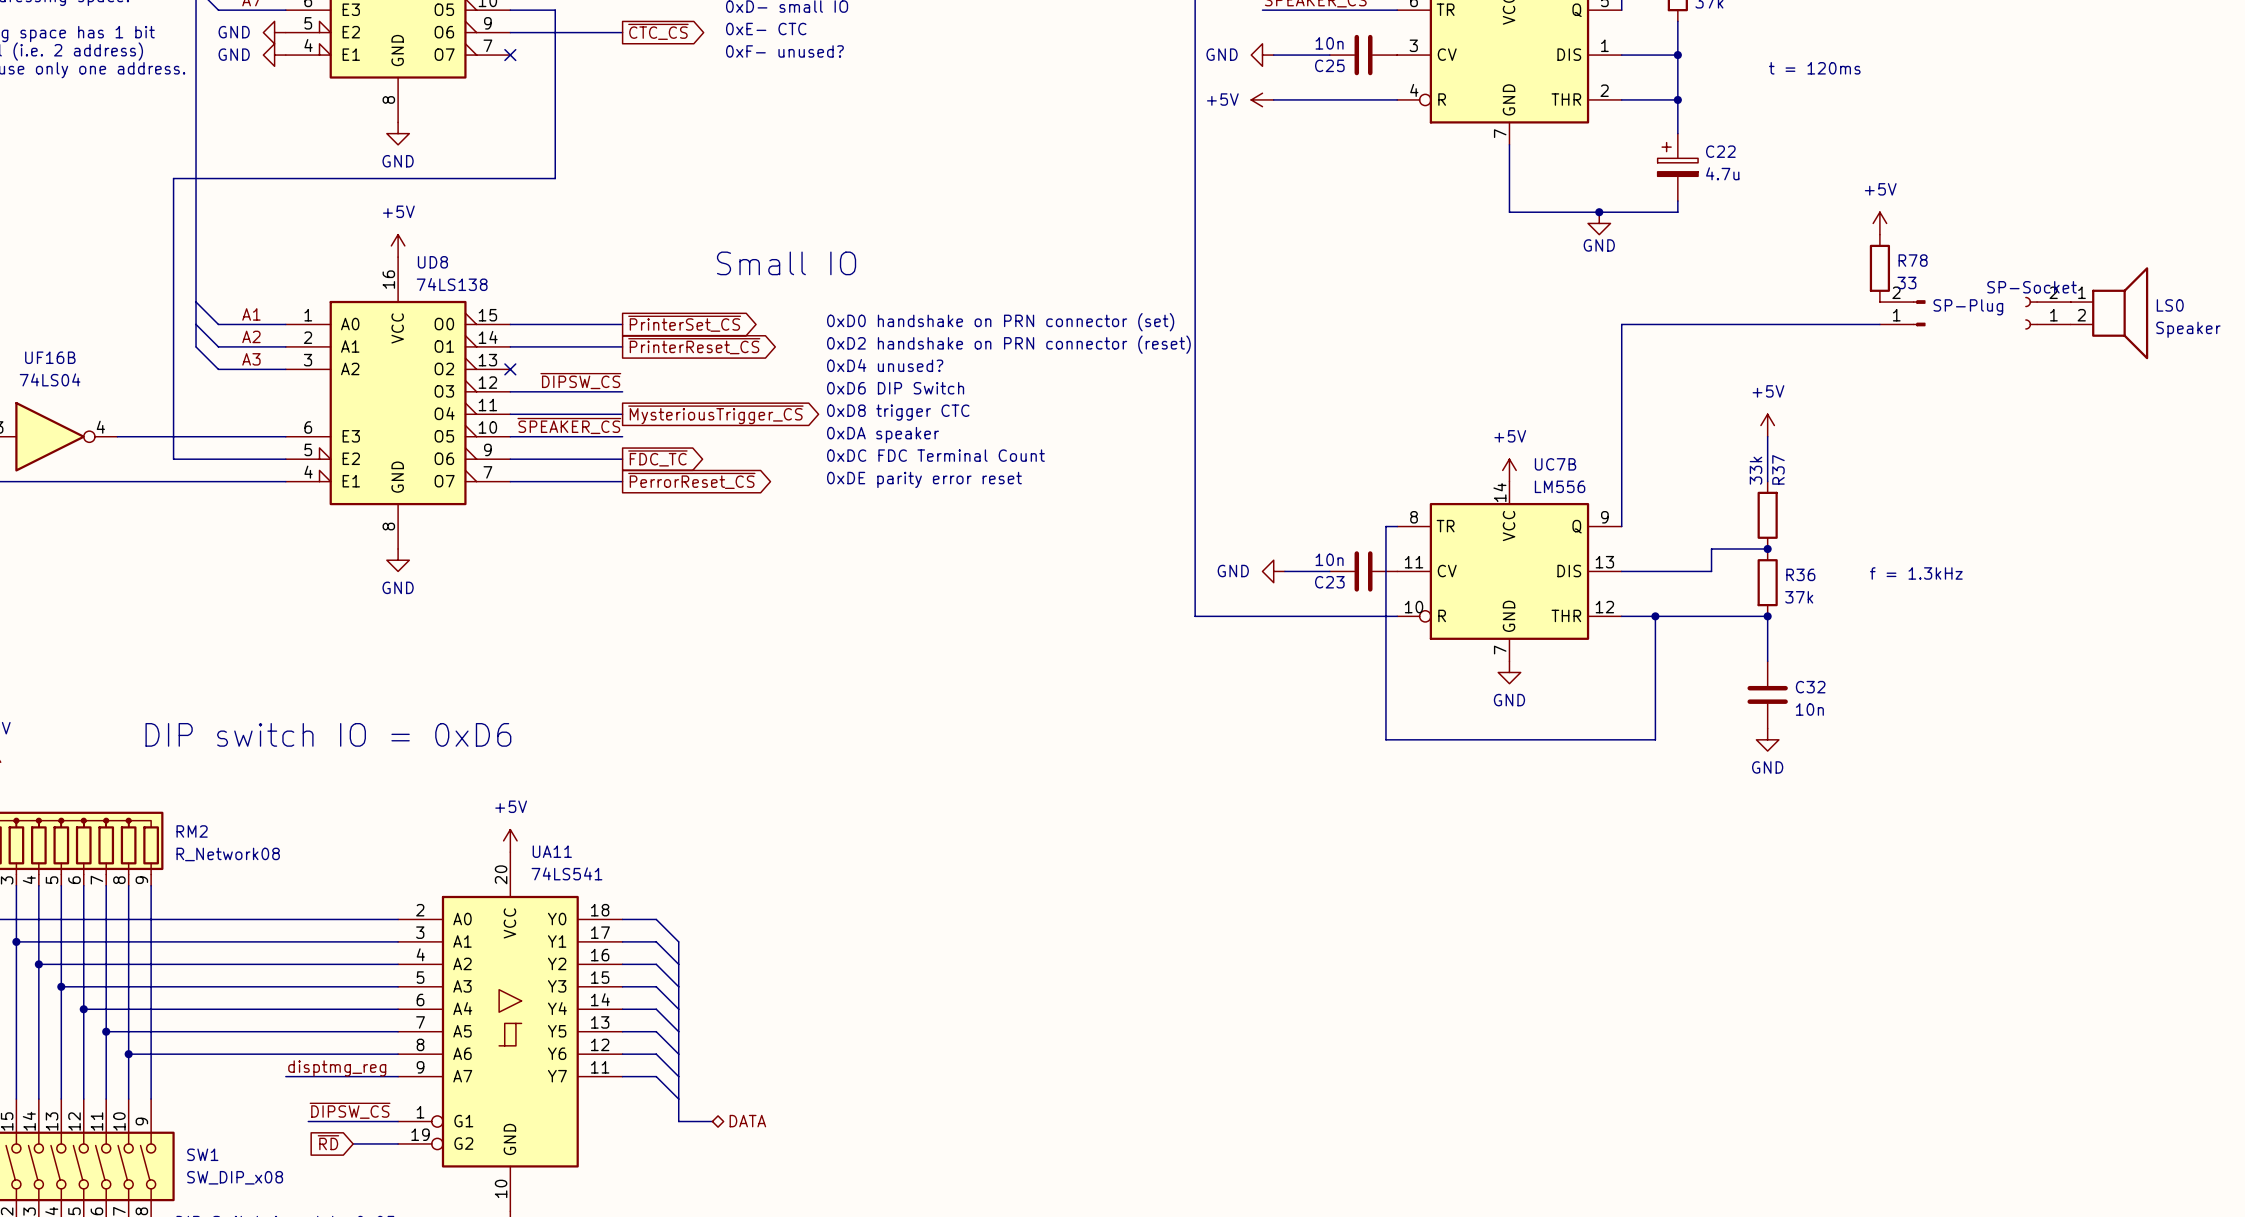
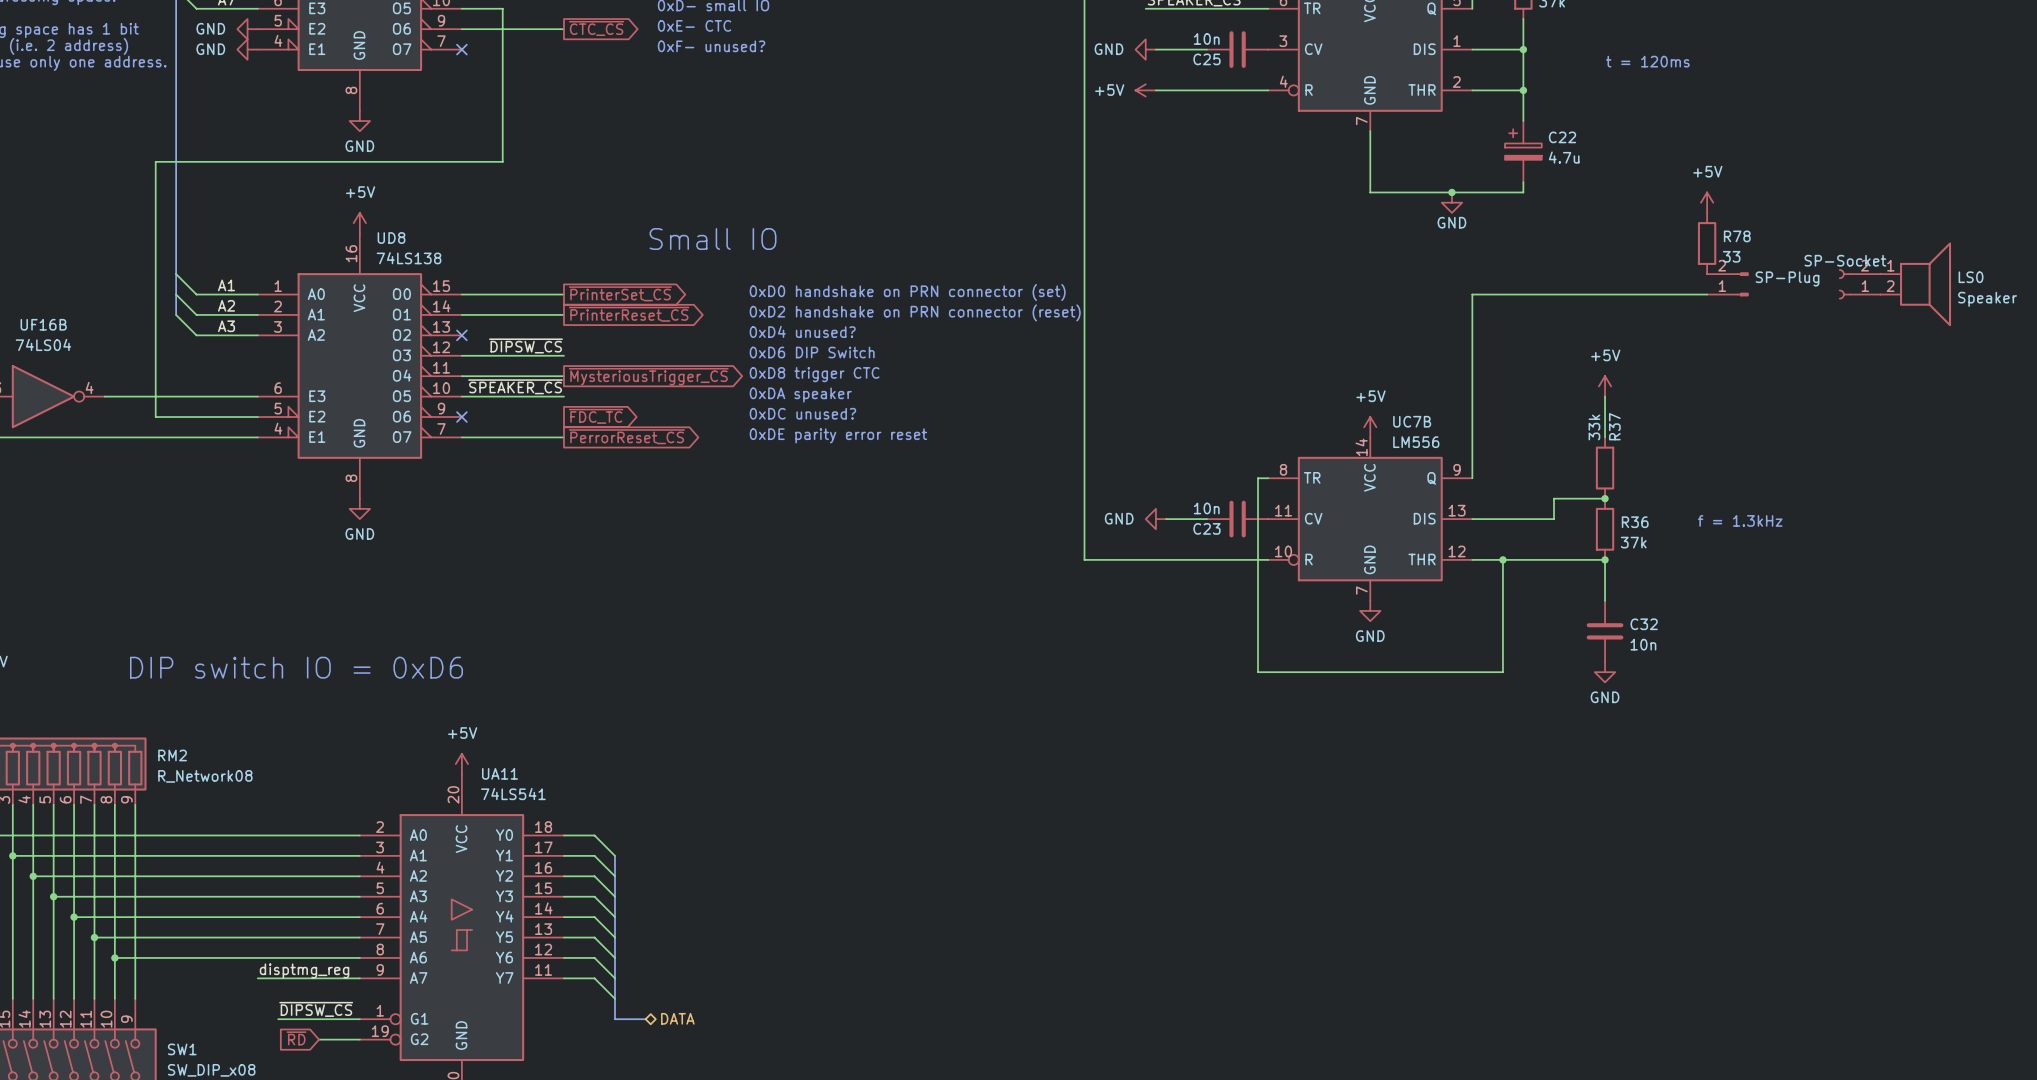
text: 0xDC FDC Terminal Count (935, 455) -> 0xDC unused? (802, 413)
wire: (510, 459) (622, 459) -> none
no-connect mark: none -> (461, 417)

